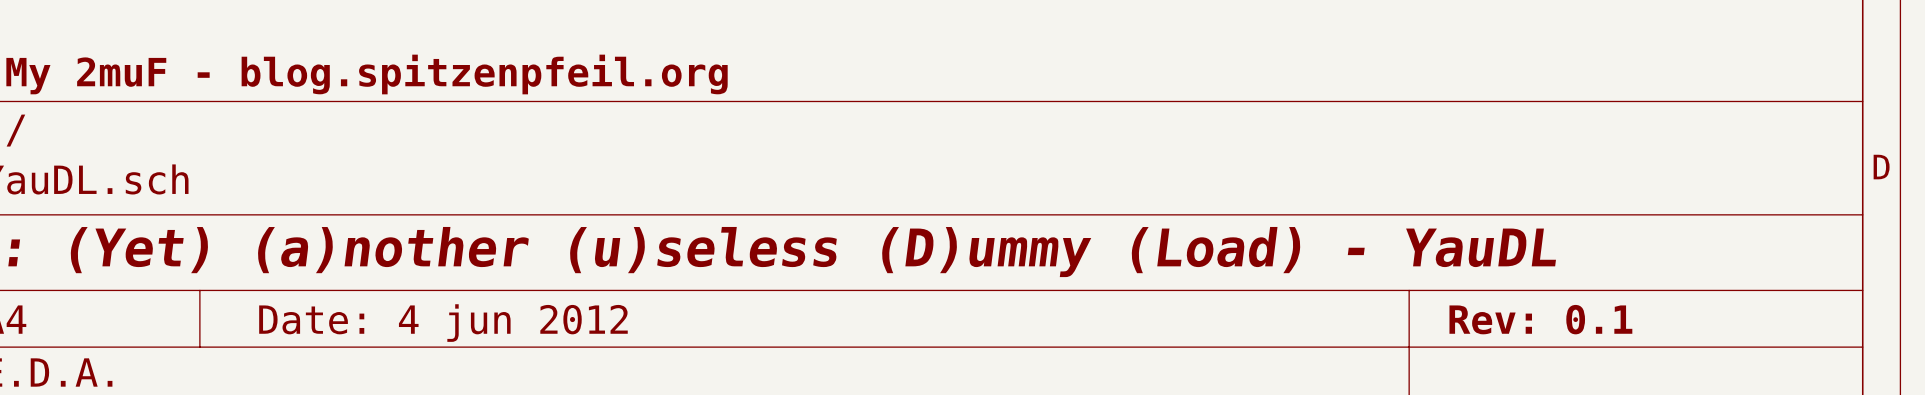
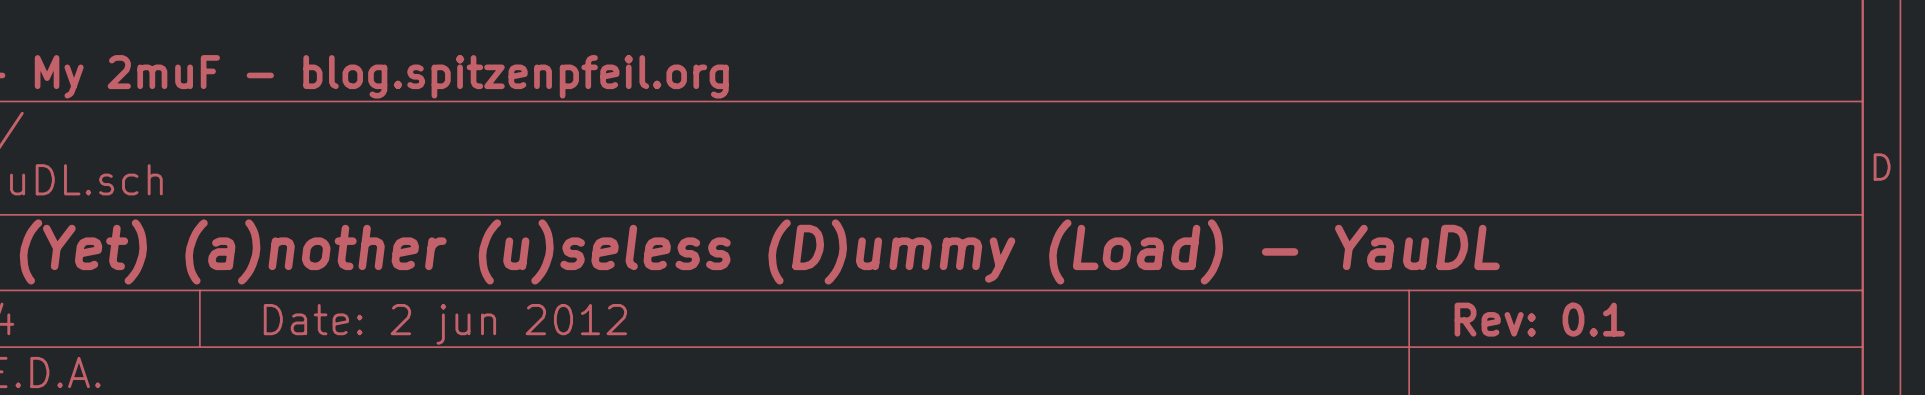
title block: Date: 4 jun 2012 (443, 323) -> Date: 2 jun 2012 (445, 324)

